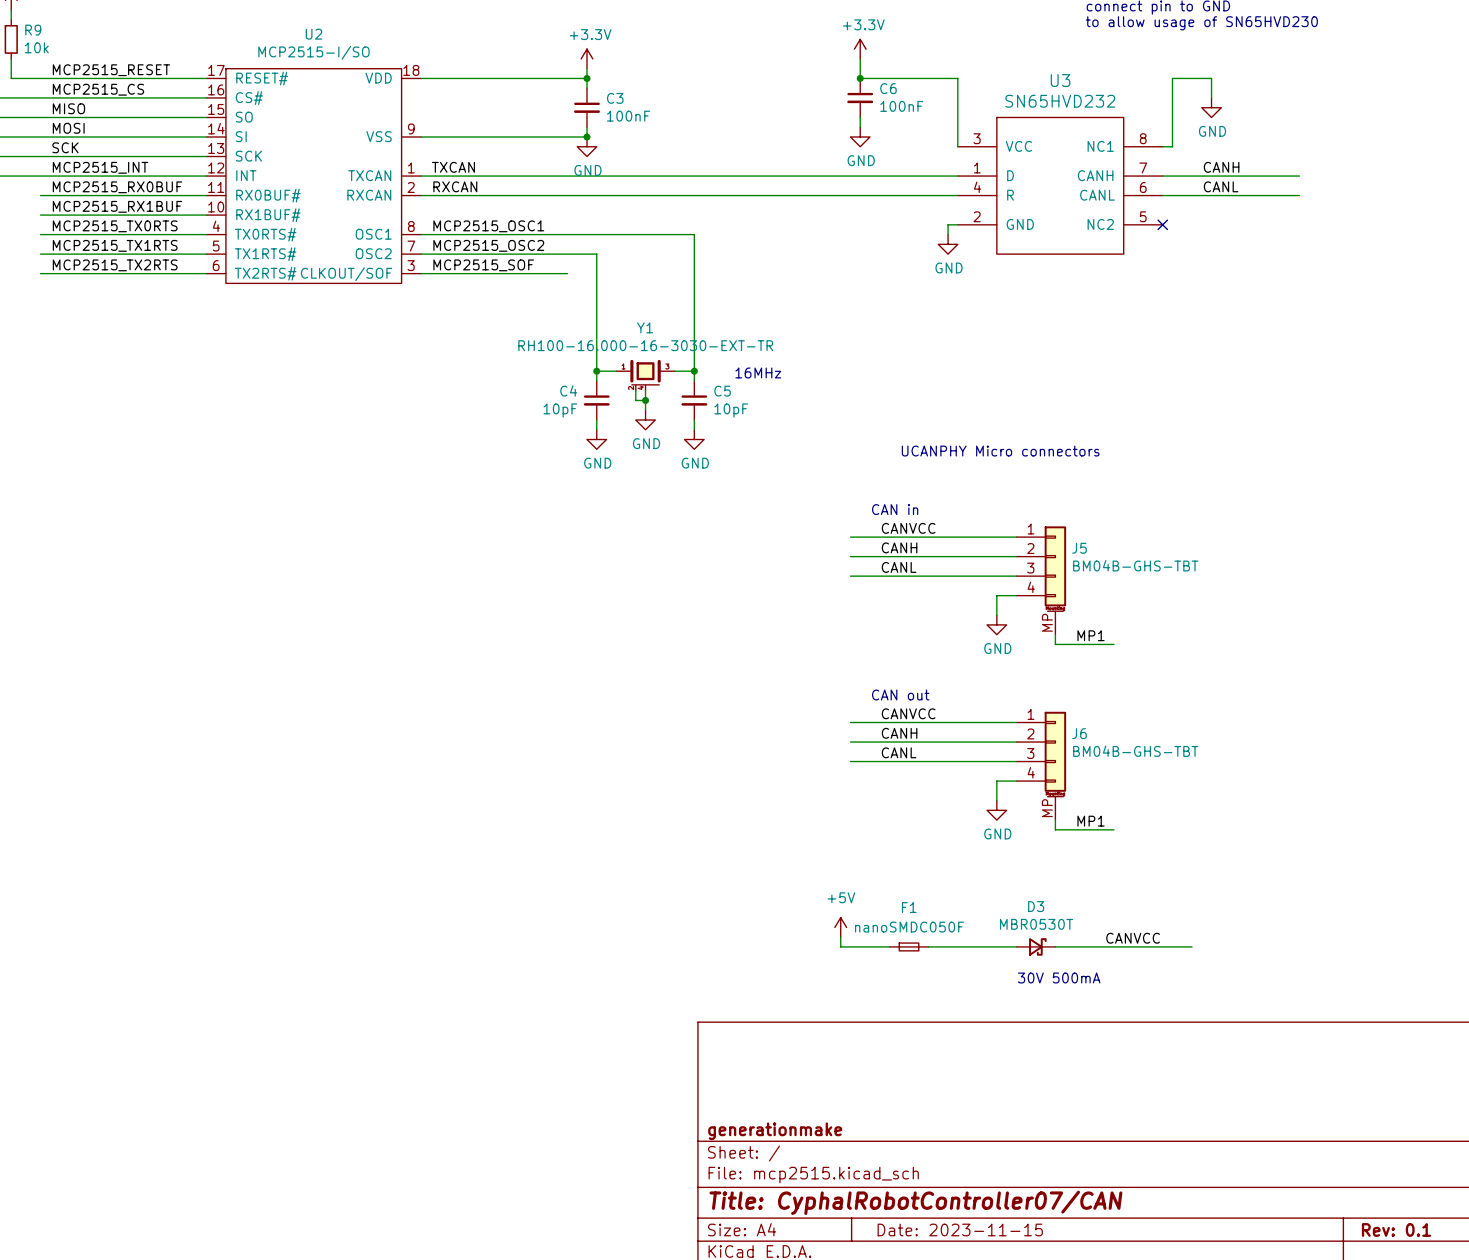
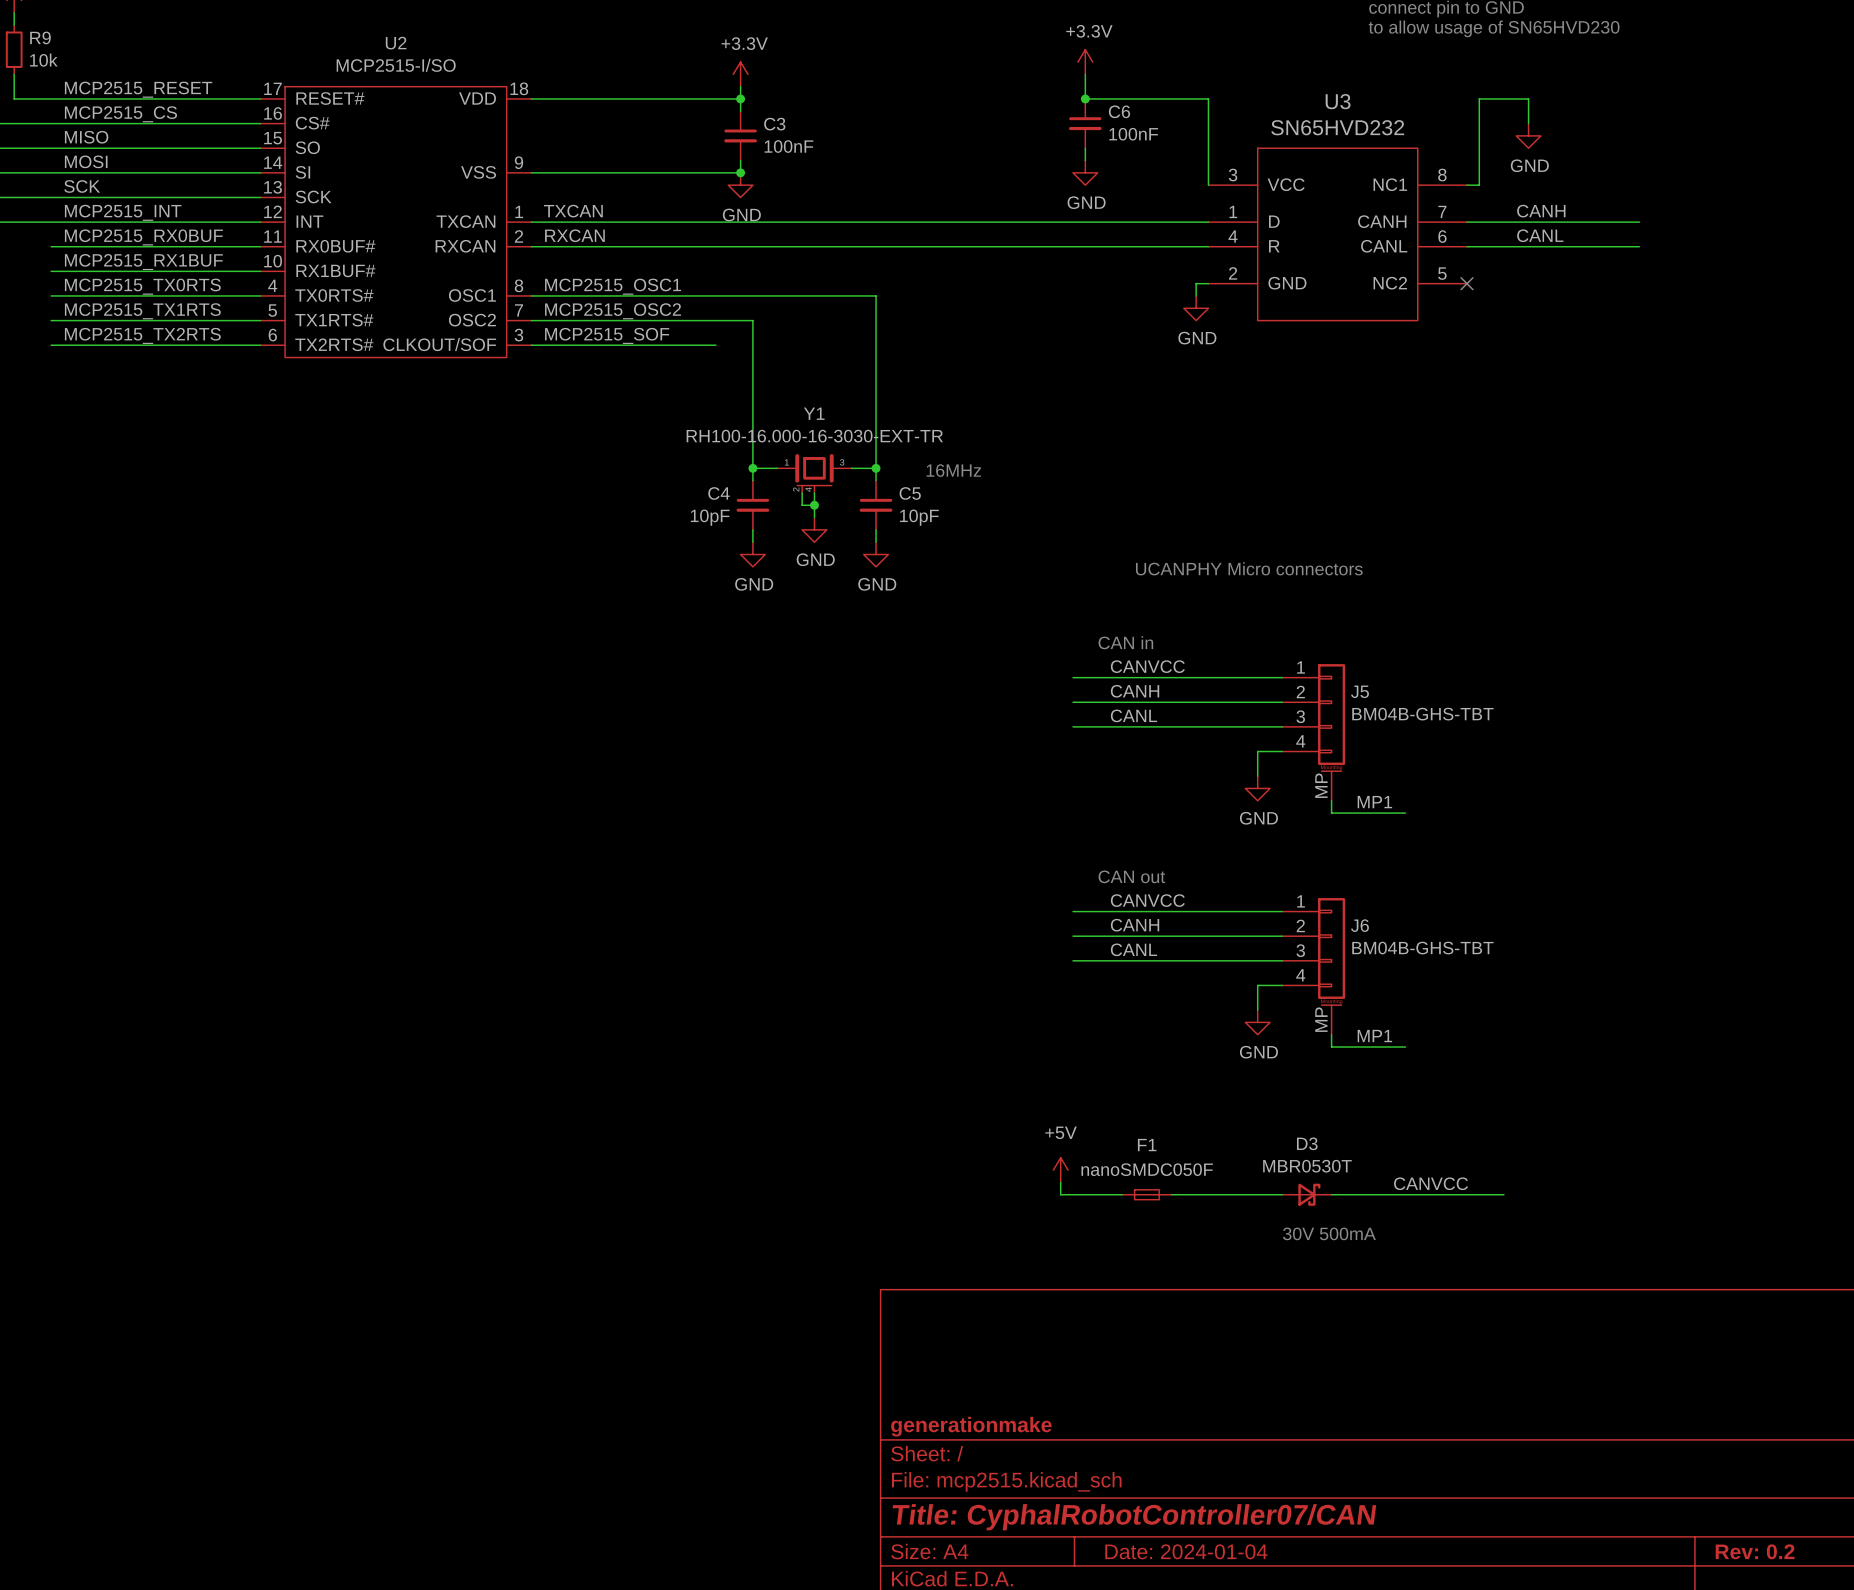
title block: Date: 2023-11-15 (960, 1229) -> Date: 2024-01-04 (1186, 1551)
title block: Rev: 0.1 (1396, 1229) -> Rev: 0.2 (1755, 1551)

